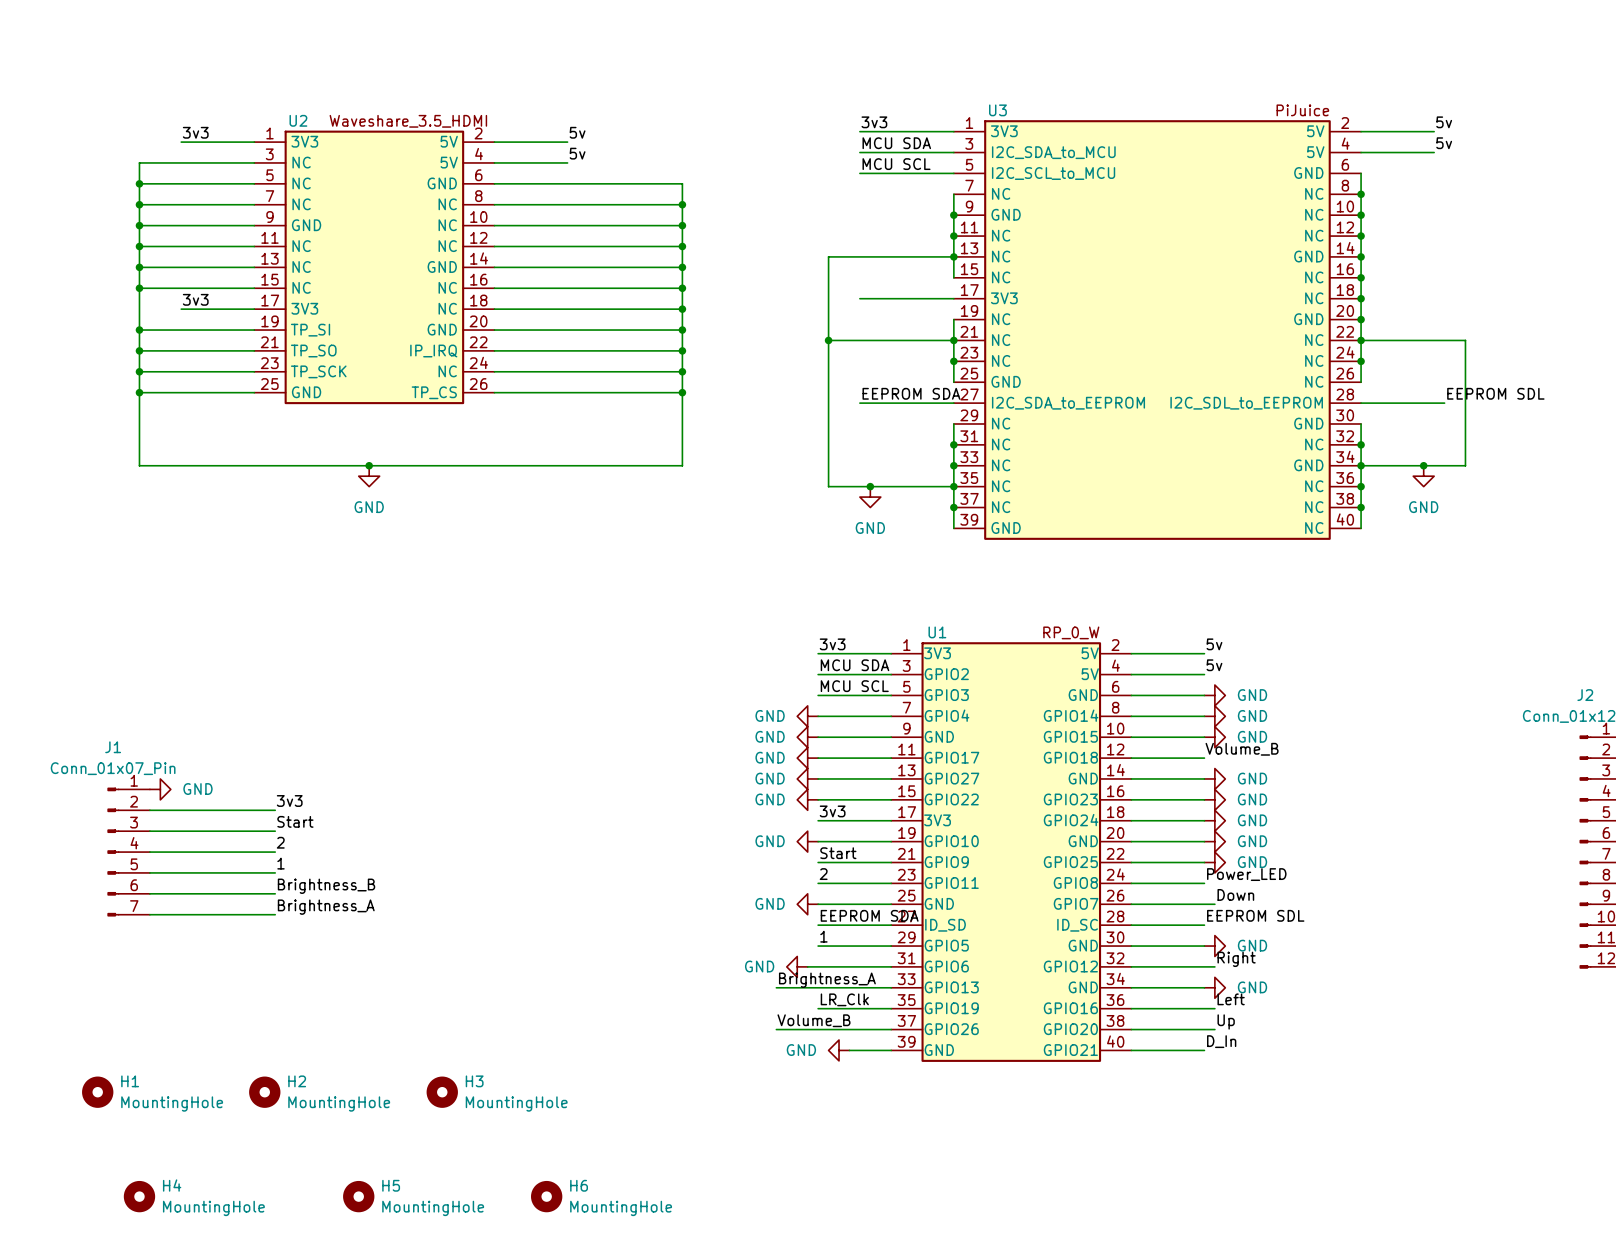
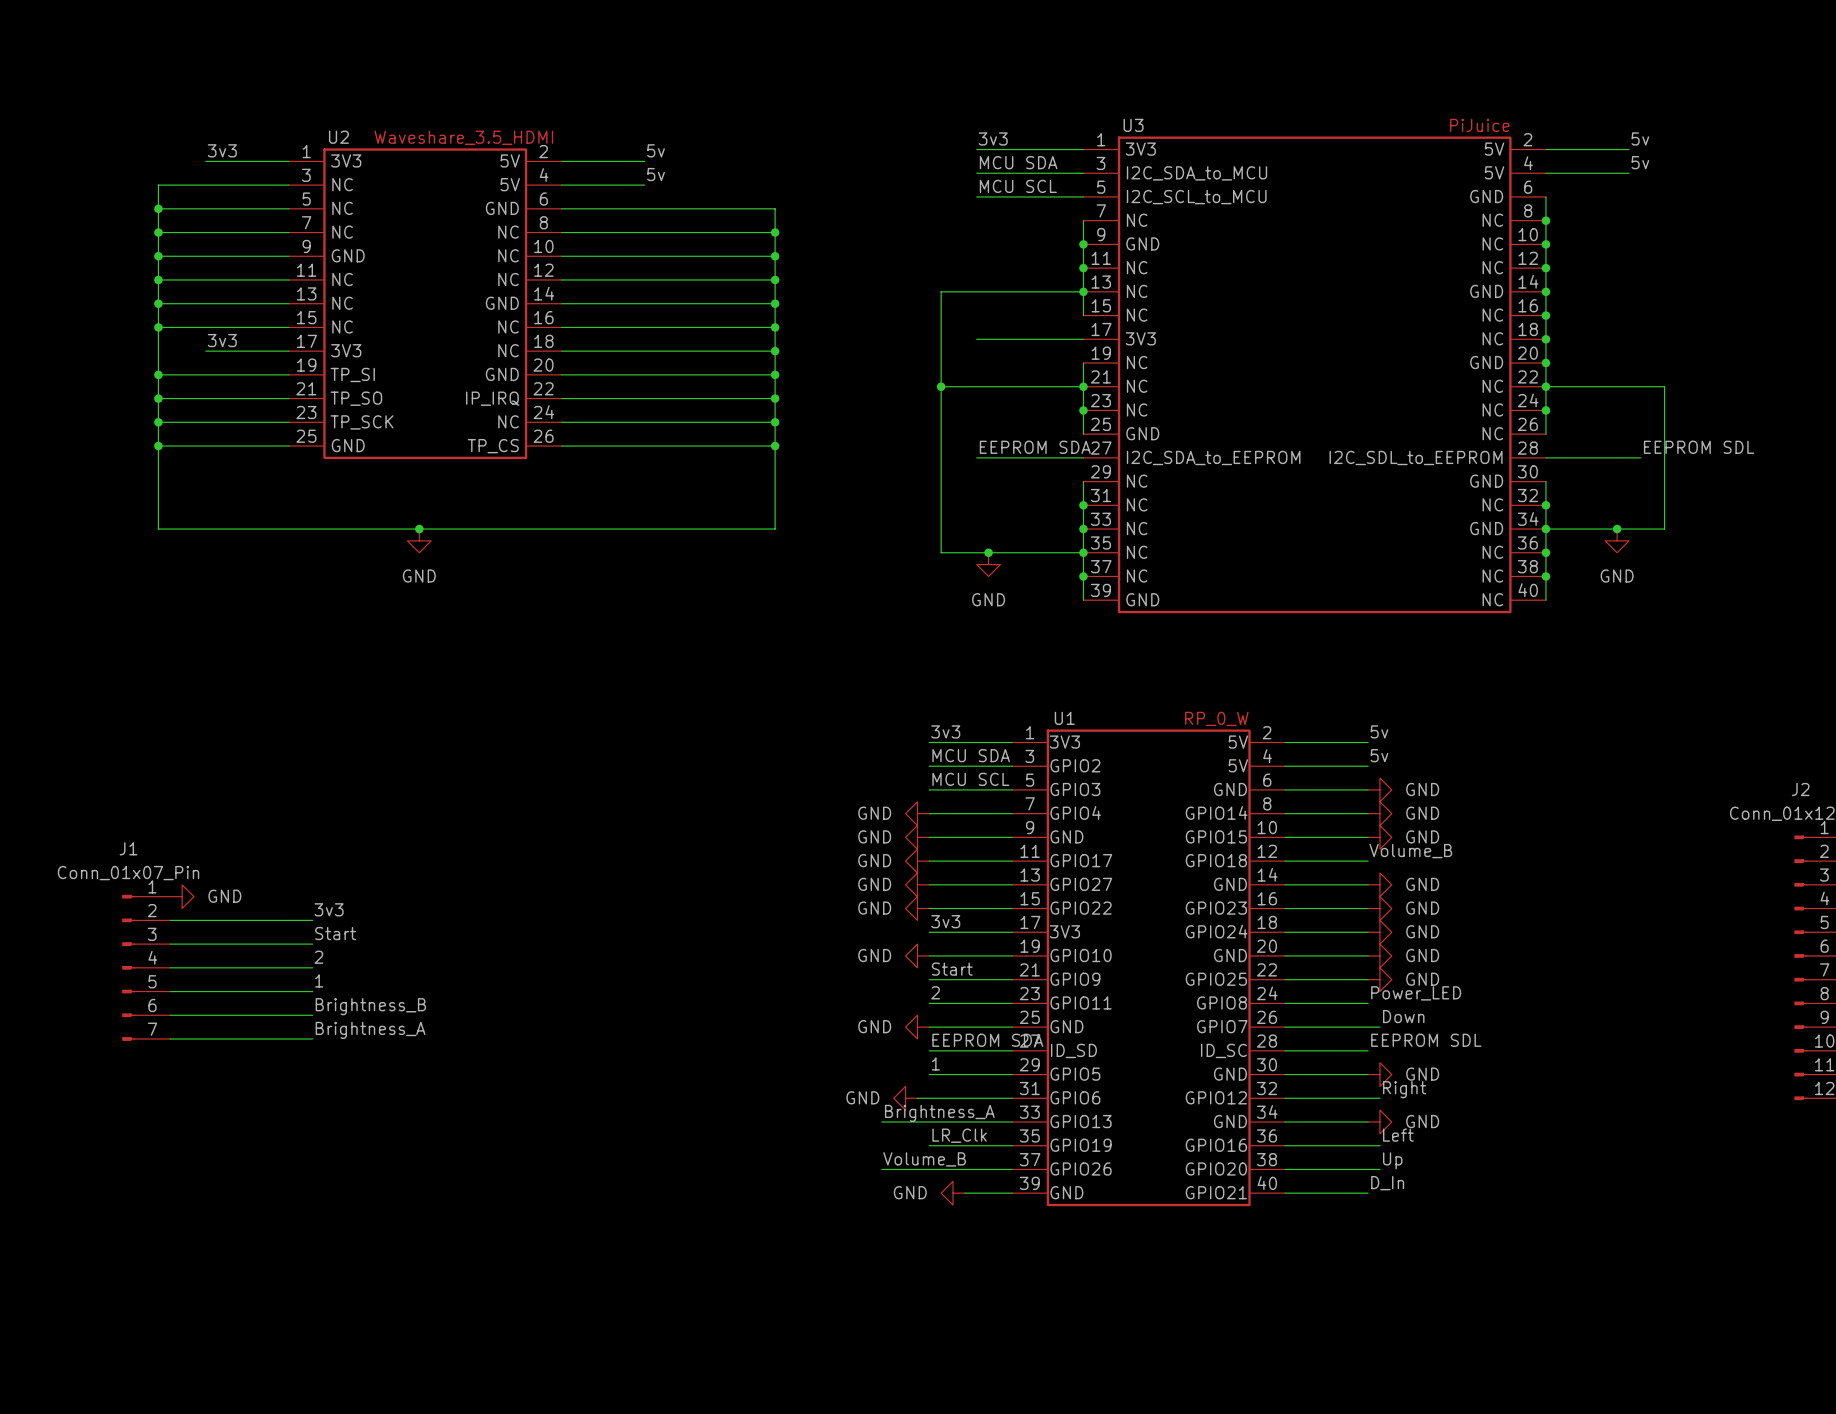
H1: MountingHole (97, 1092) -> none
H2: MountingHole (264, 1092) -> none
H3: MountingHole (442, 1092) -> none
H4: MountingHole (139, 1196) -> none
H5: MountingHole (358, 1196) -> none
H6: MountingHole (546, 1196) -> none

